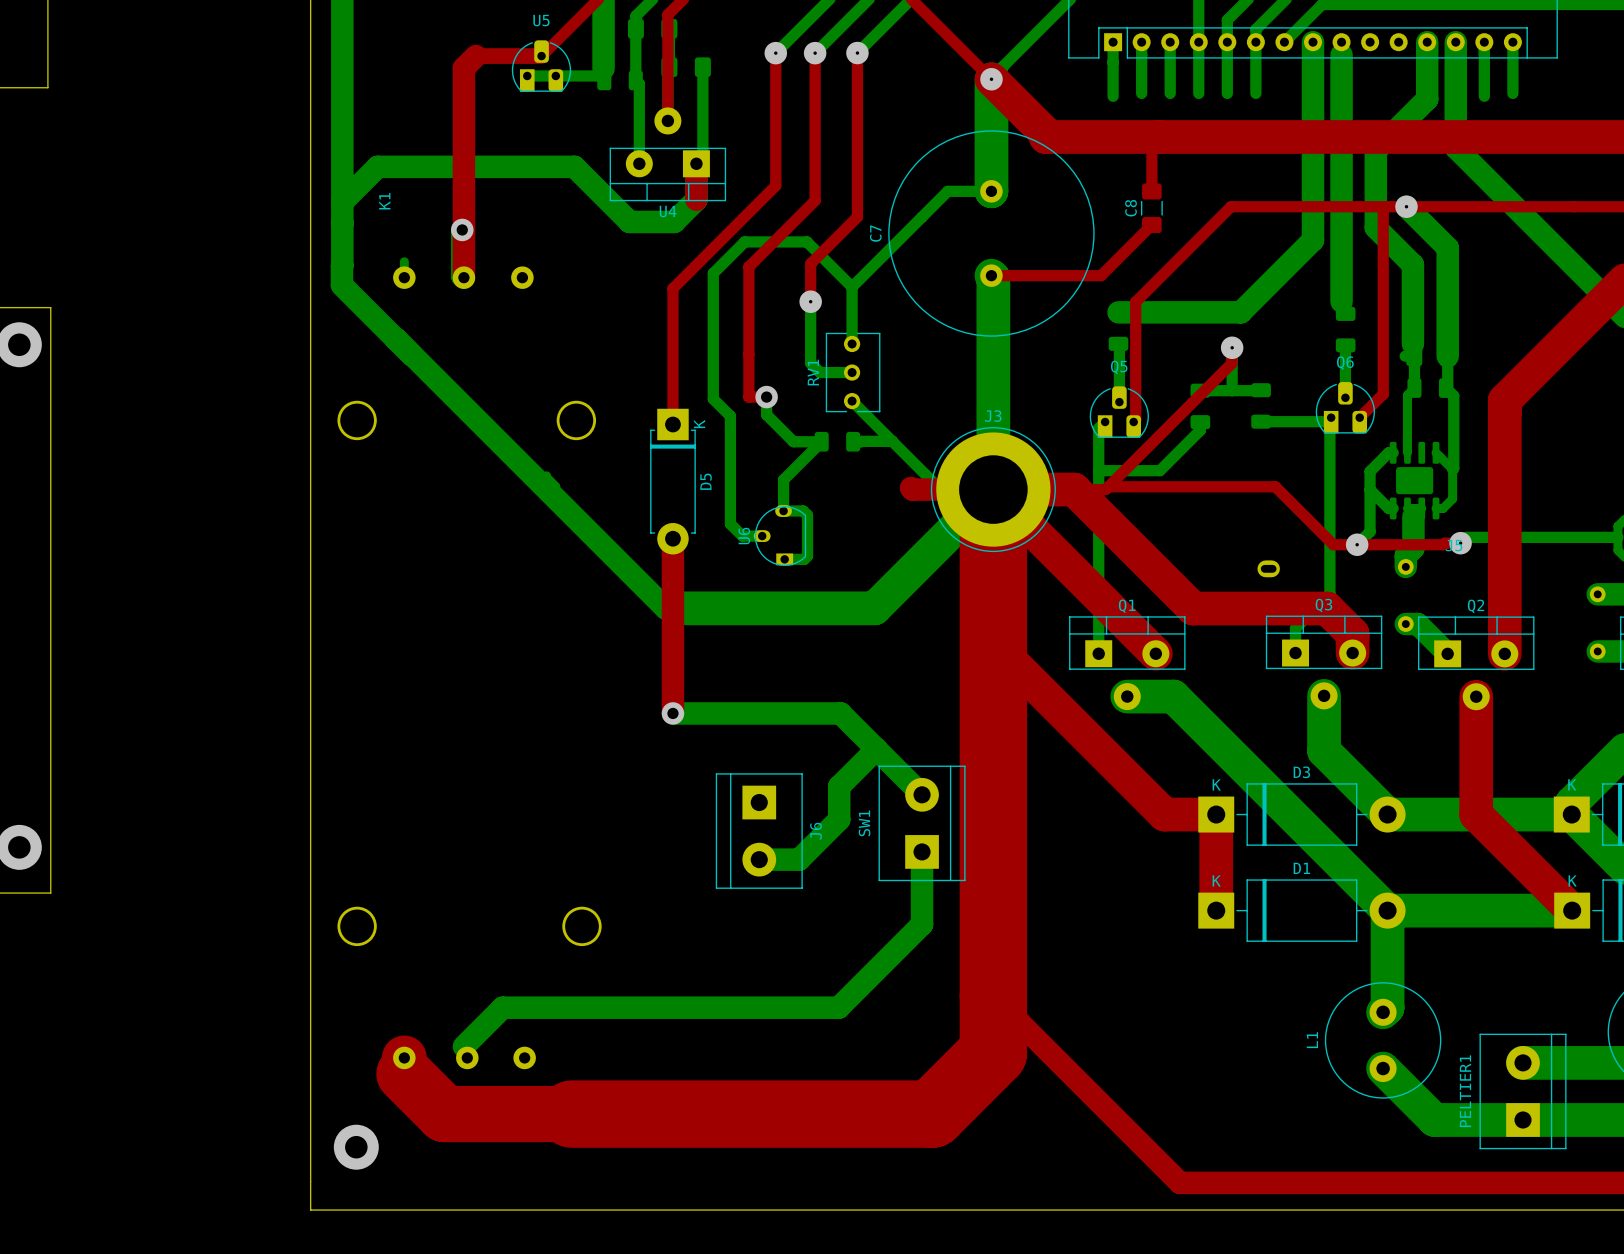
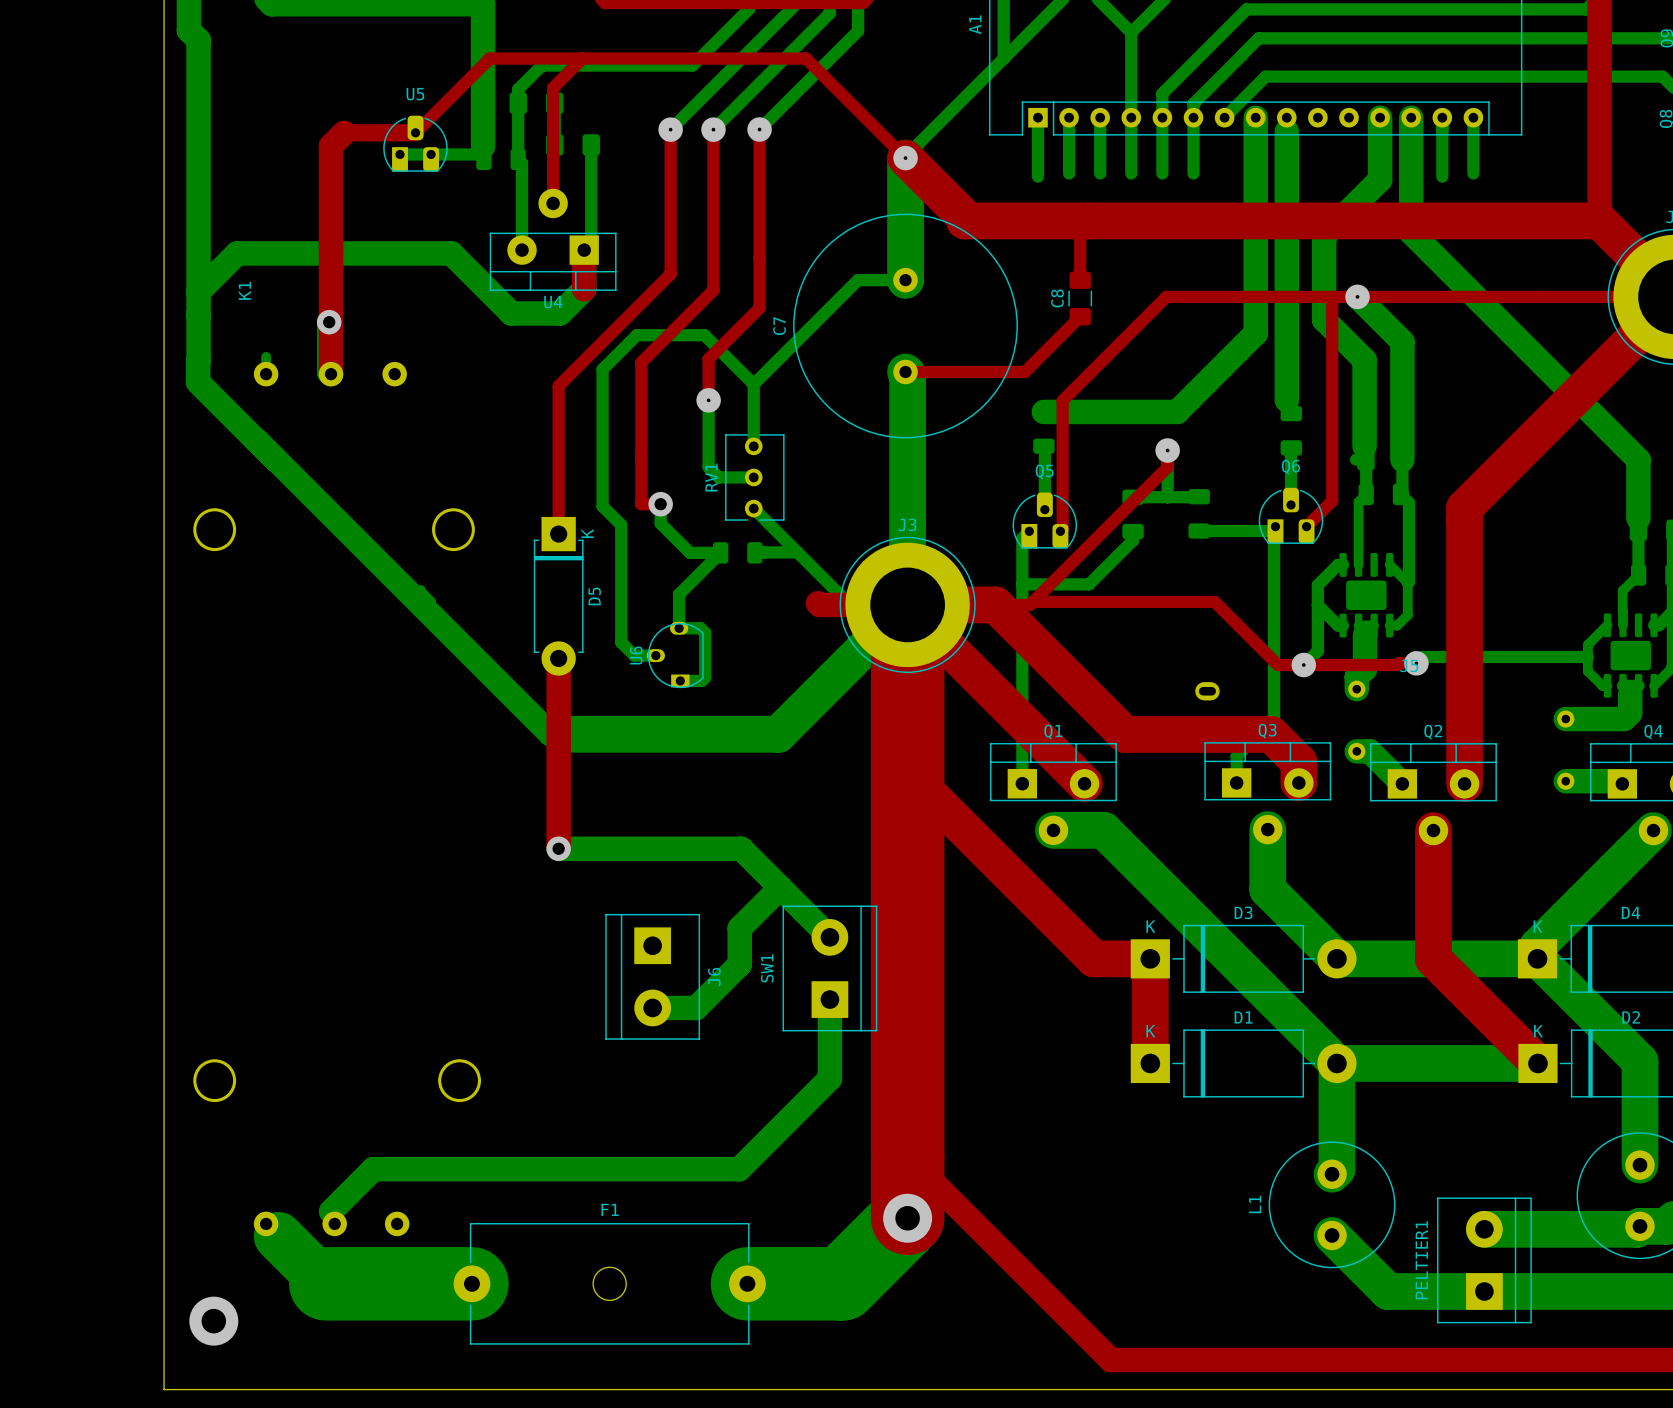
bottom track: none -> (907, 1218) (842, 1283) (747, 1283)
top track: (993, 1052) (932, 1114) (444, 1114) (404, 1073) (404, 1057) -> none
via: none -> (907, 1218)
bottom track: none -> (278, 1236) (325, 1283) (471, 1283)
F1: none -> (609, 1283)

